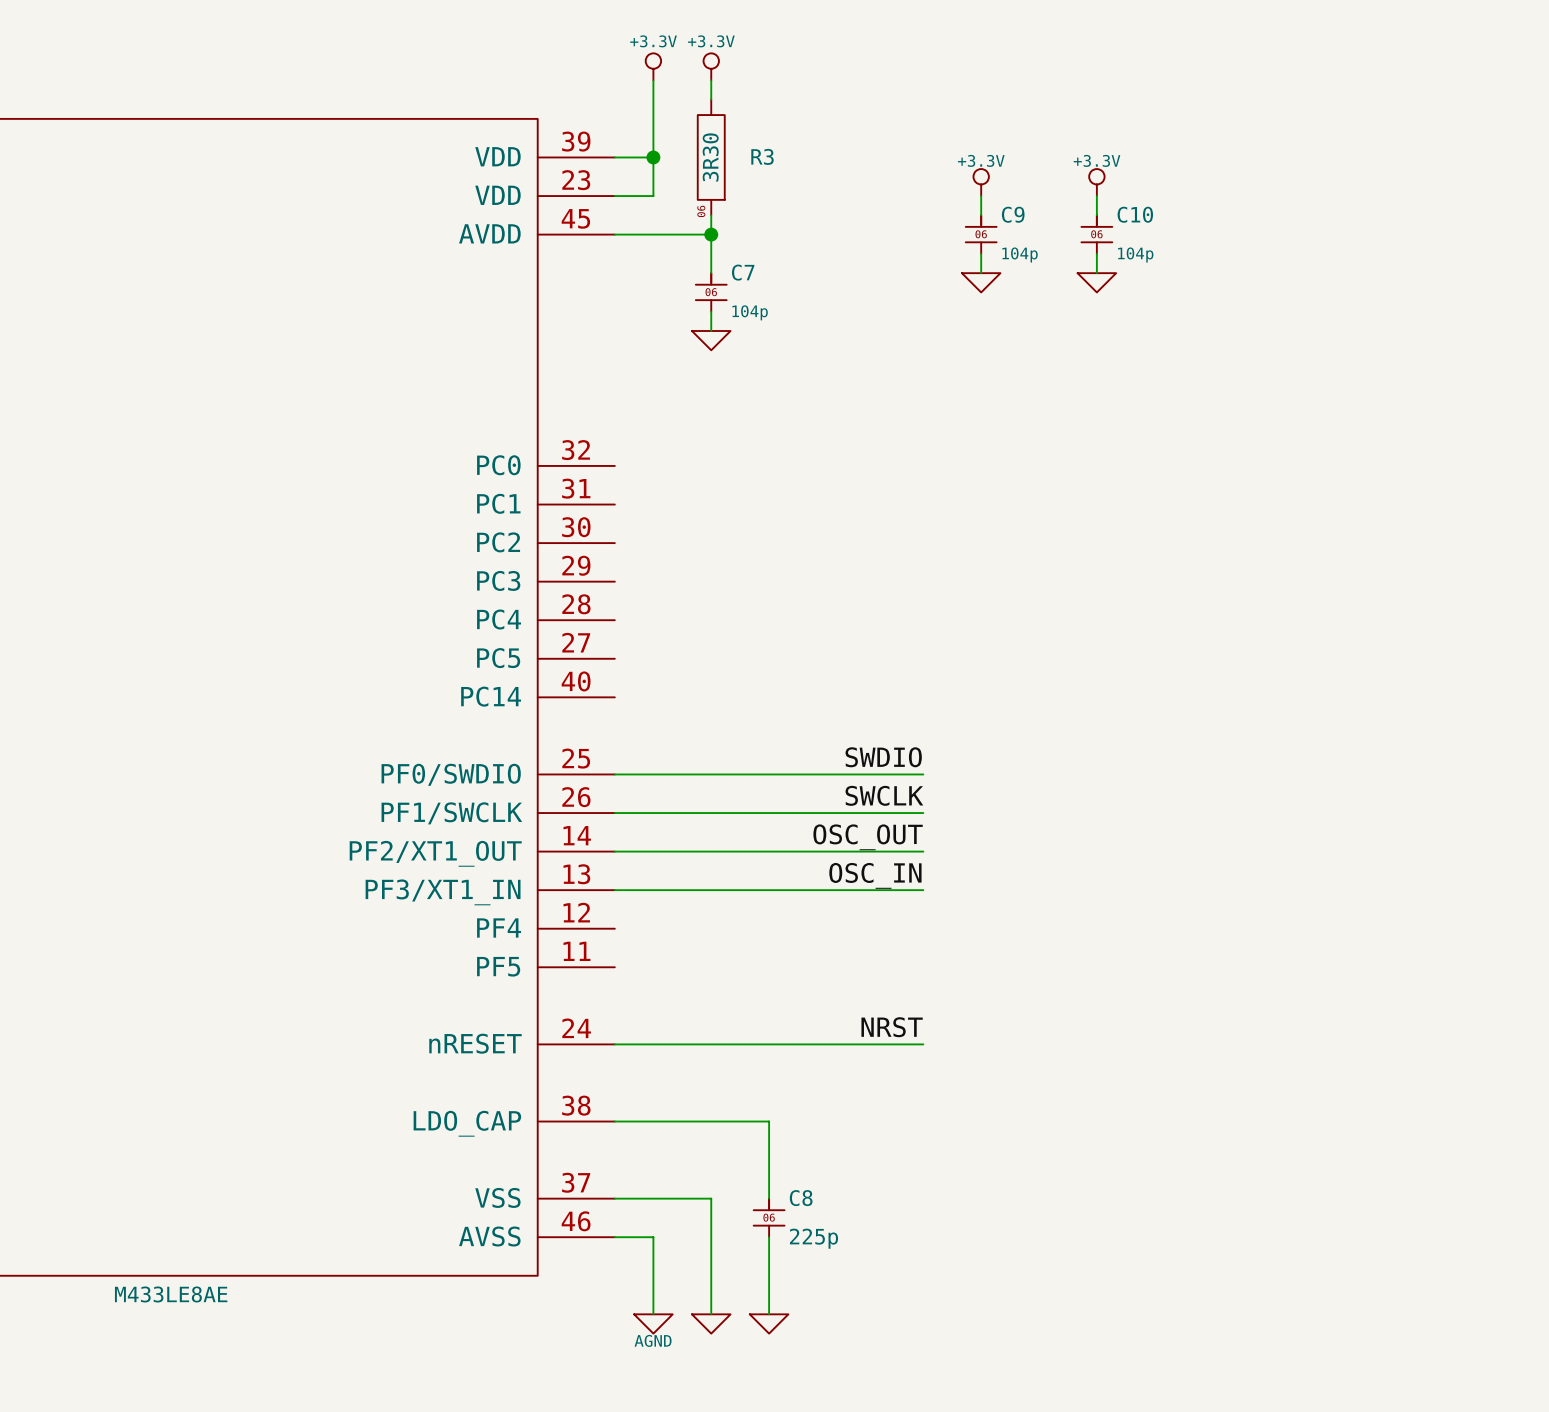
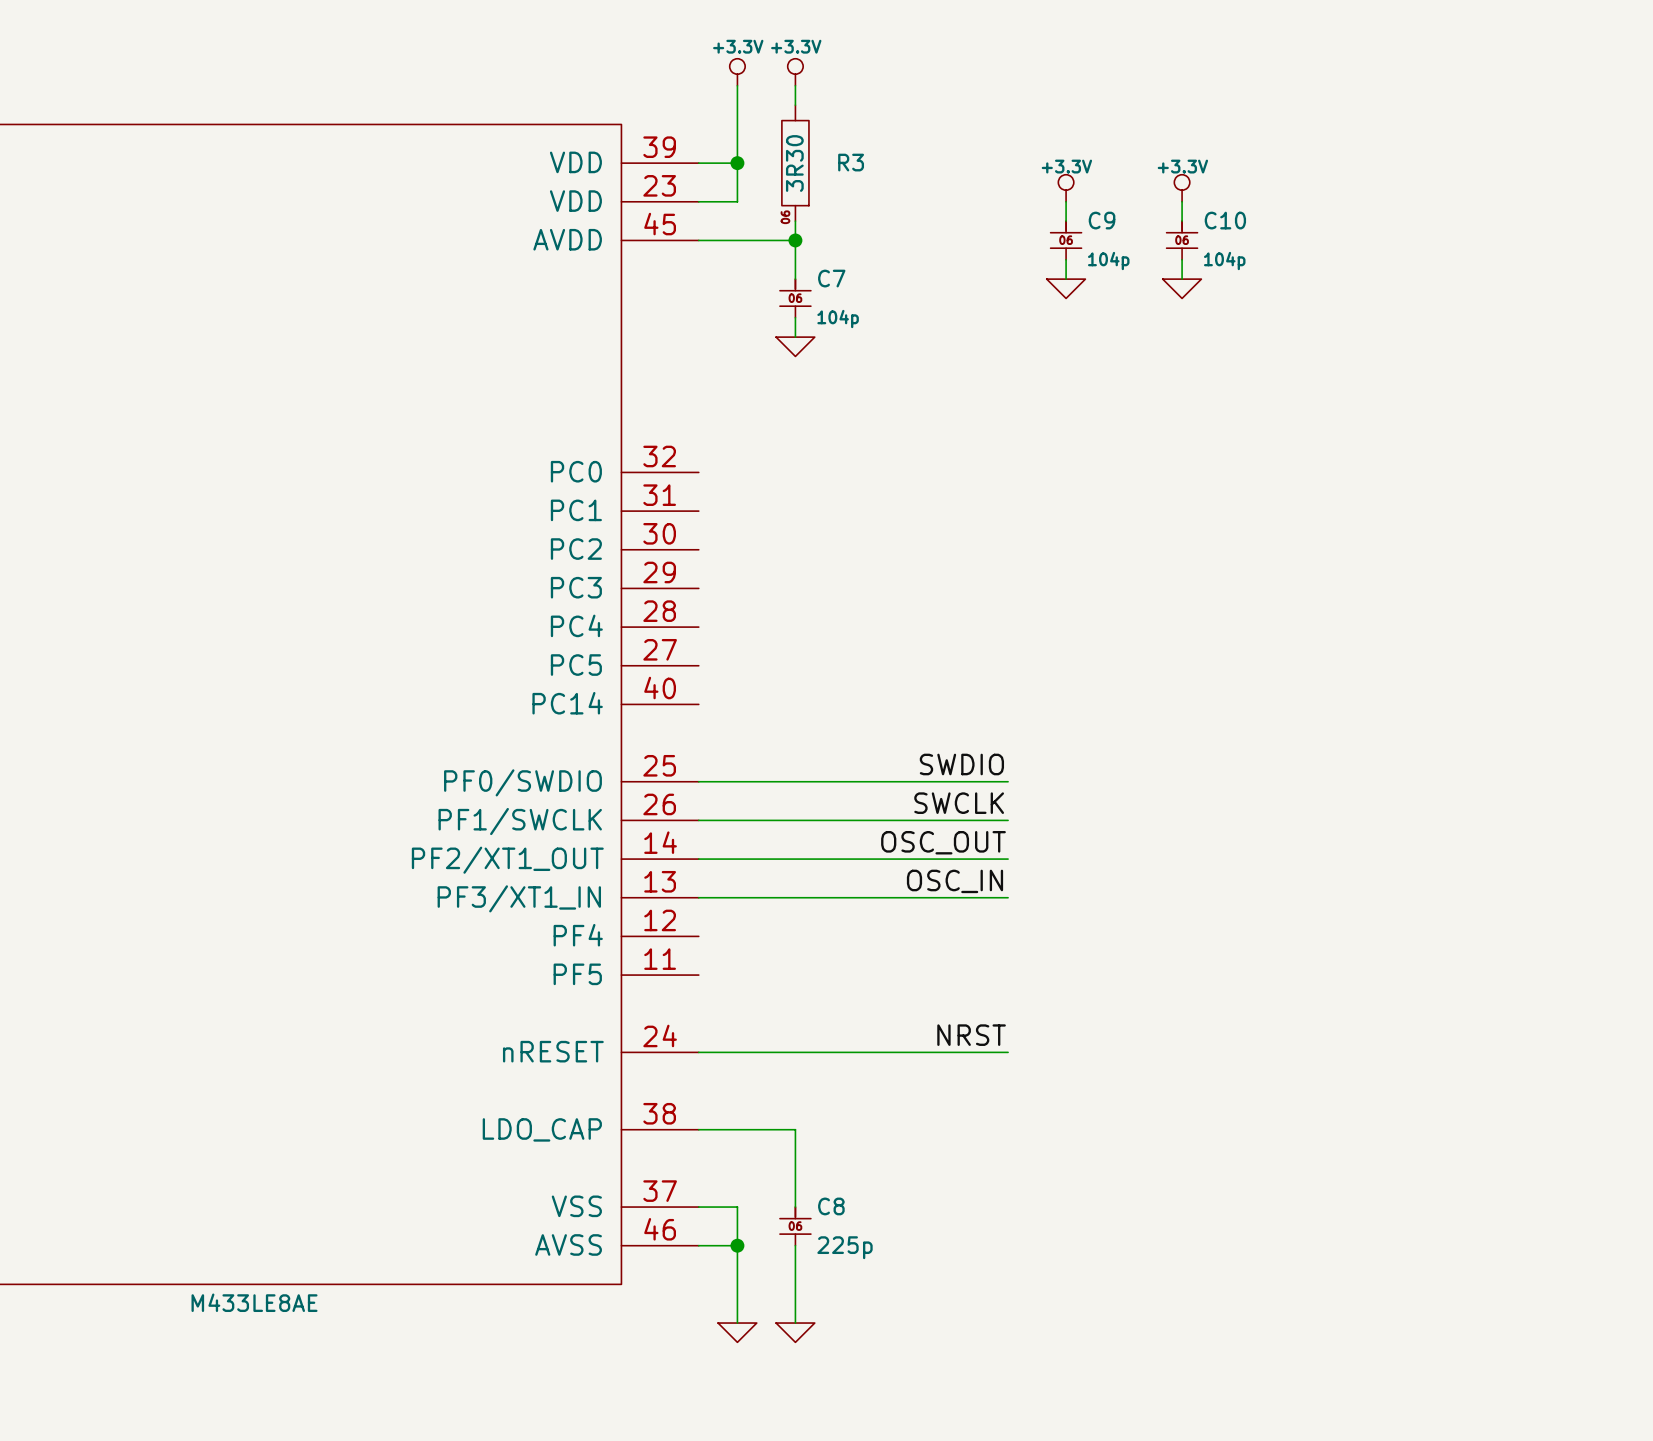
wire: (711, 1121) (769, 1121) (769, 1198) -> (795, 1129) (795, 1207)
wire: (653, 1198) (711, 1198) (711, 1237) -> (737, 1207) (737, 1245)
C8 position: (769, 1217) -> (795, 1226)
junction: none -> (737, 1245)
wire: (769, 1237) (769, 1314) -> none
power symbol: (769, 1323) -> none
power symbol text: AGND (653, 1340) -> none

